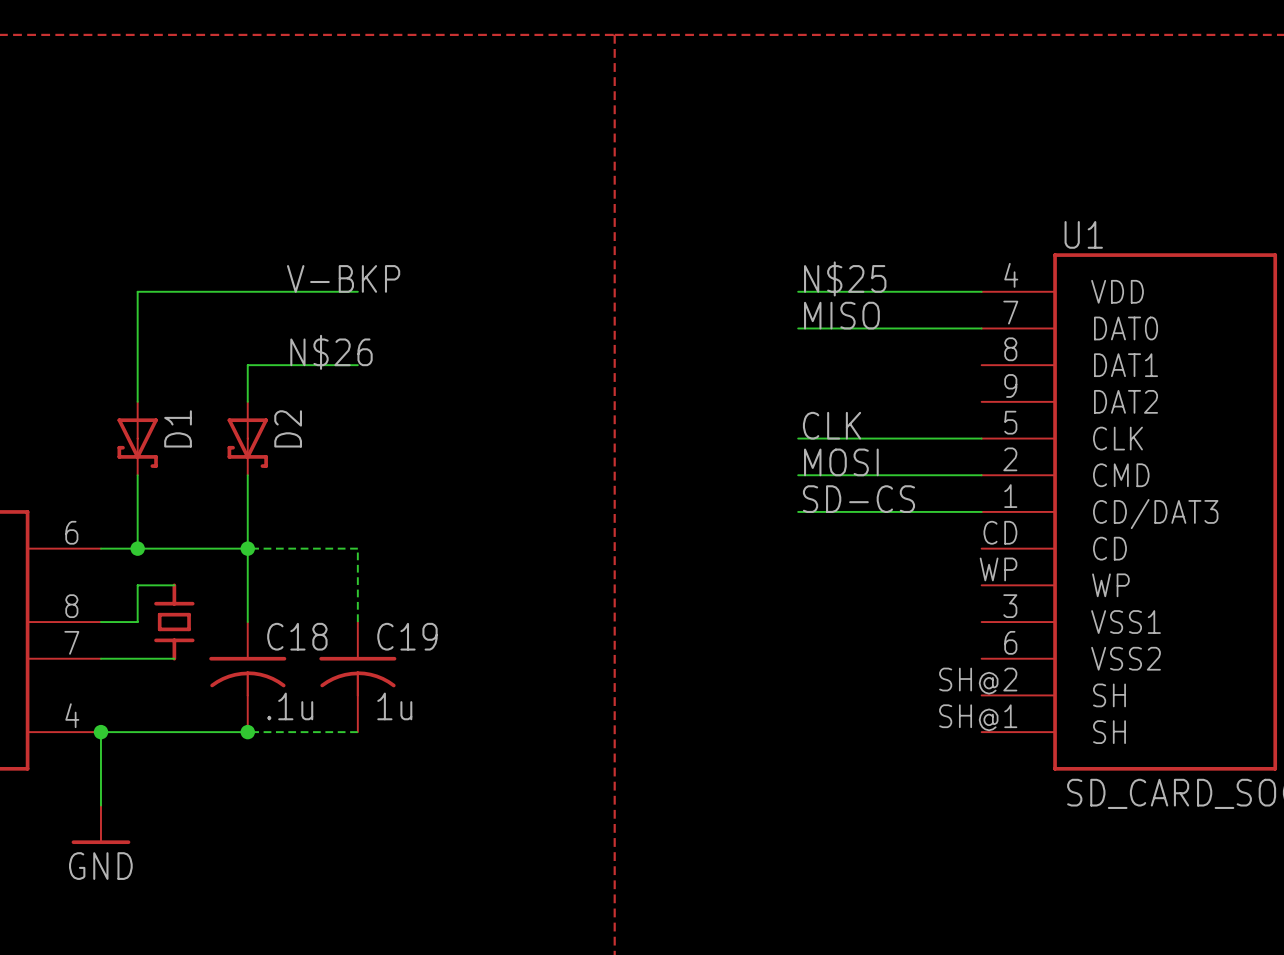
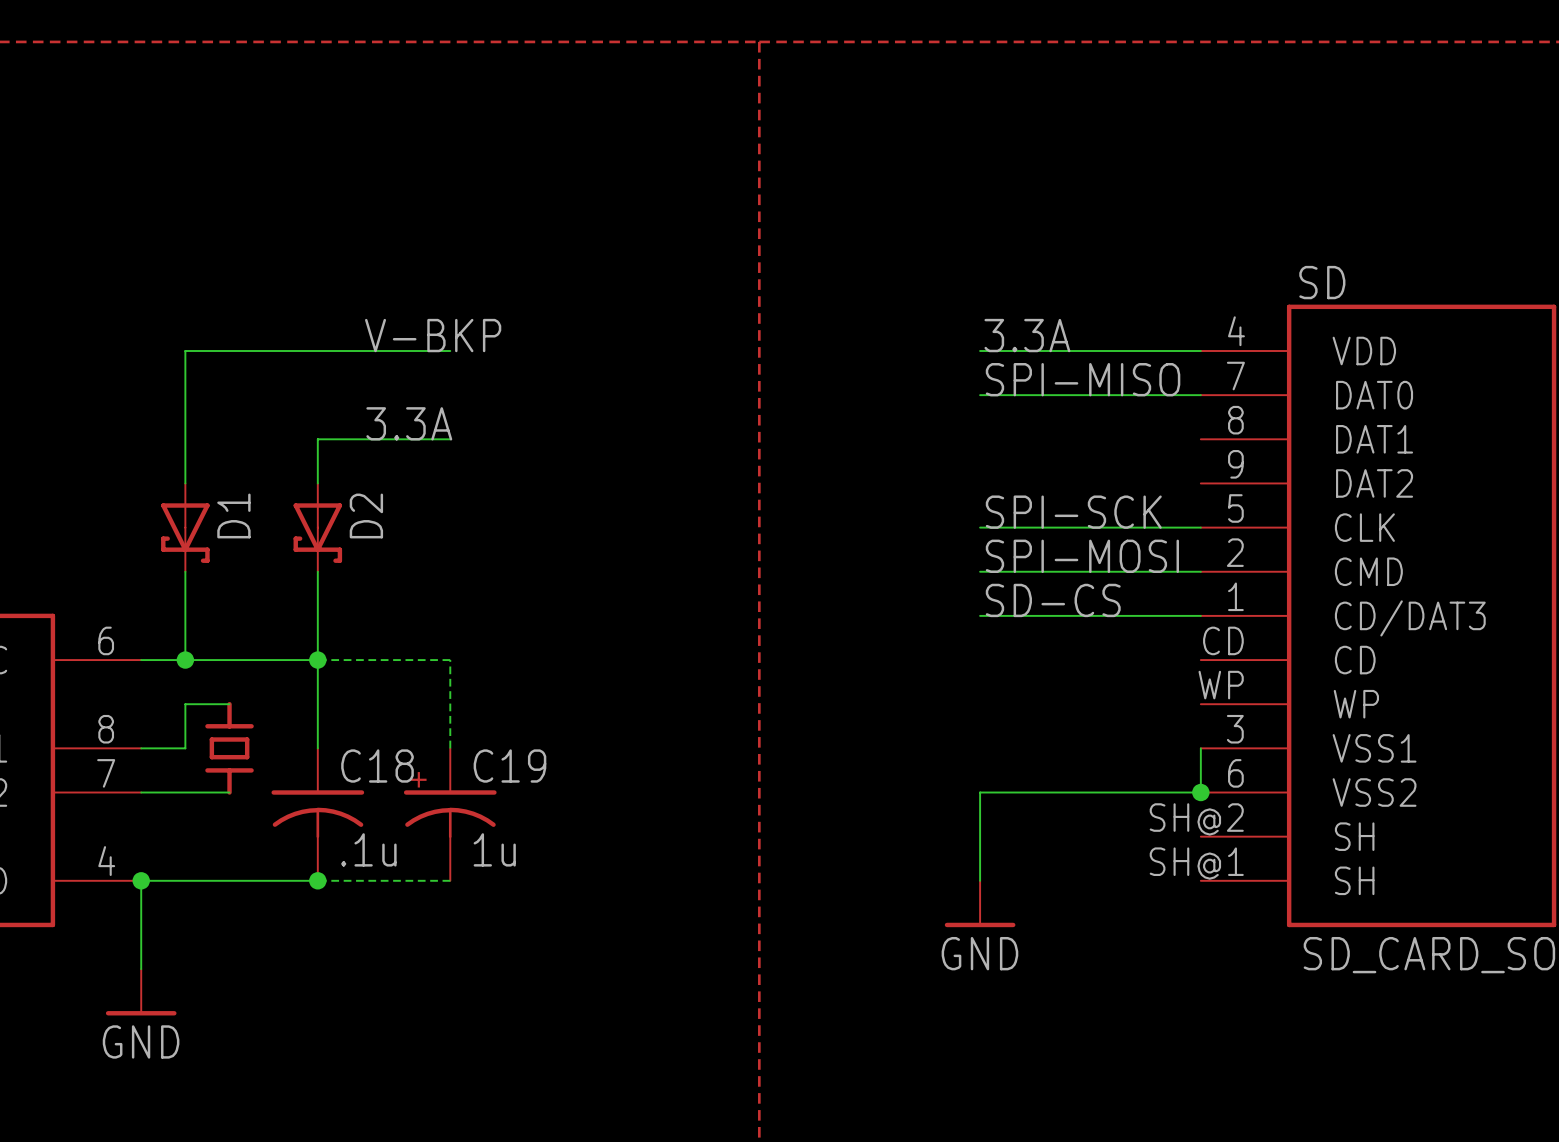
U1 name: U1 (1083, 234) -> SD (1322, 282)
label: N$25 (845, 278) -> 3.3A (1027, 335)
label: MISO (841, 315) -> SPI-MISO (1083, 379)
label: N$26 (331, 352) -> 3.3A (409, 423)
label: CLK (832, 425) -> SPI-SCK (1073, 512)
label: MOSI (841, 462) -> SPI-MOSI (1082, 556)
C19 symbol: [319, 622, 397, 733] -> [403, 748, 497, 881]
wire: none -> (1200, 748) (1200, 792) (980, 792) (980, 880)
junction: none -> (1200, 792)
power symbol: none -> GND (980, 903)

